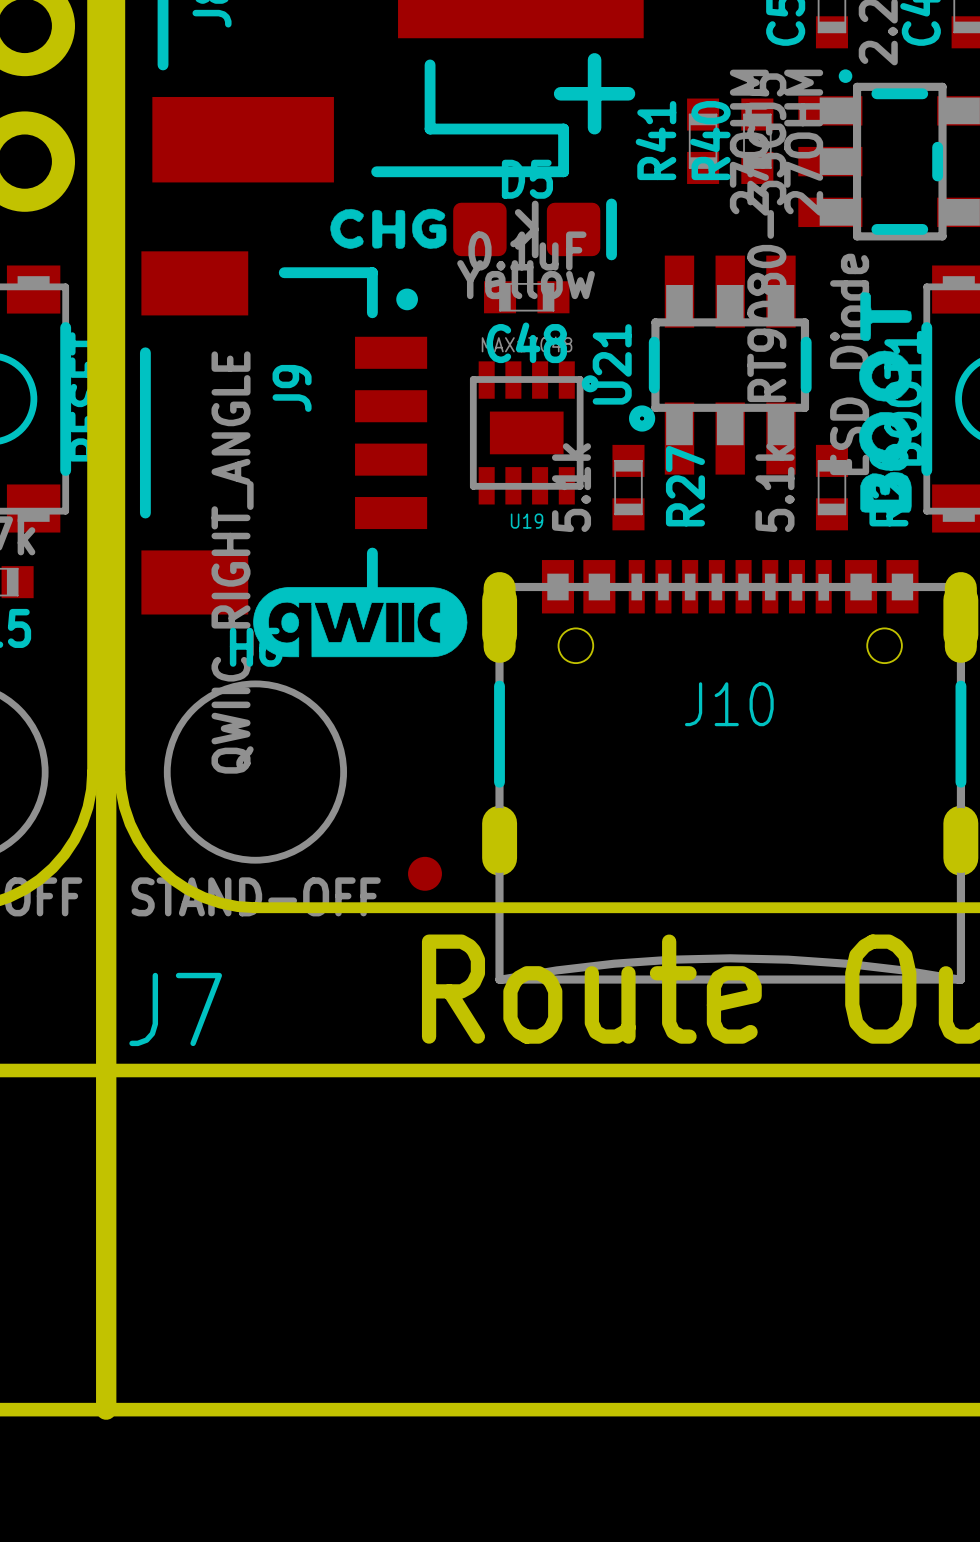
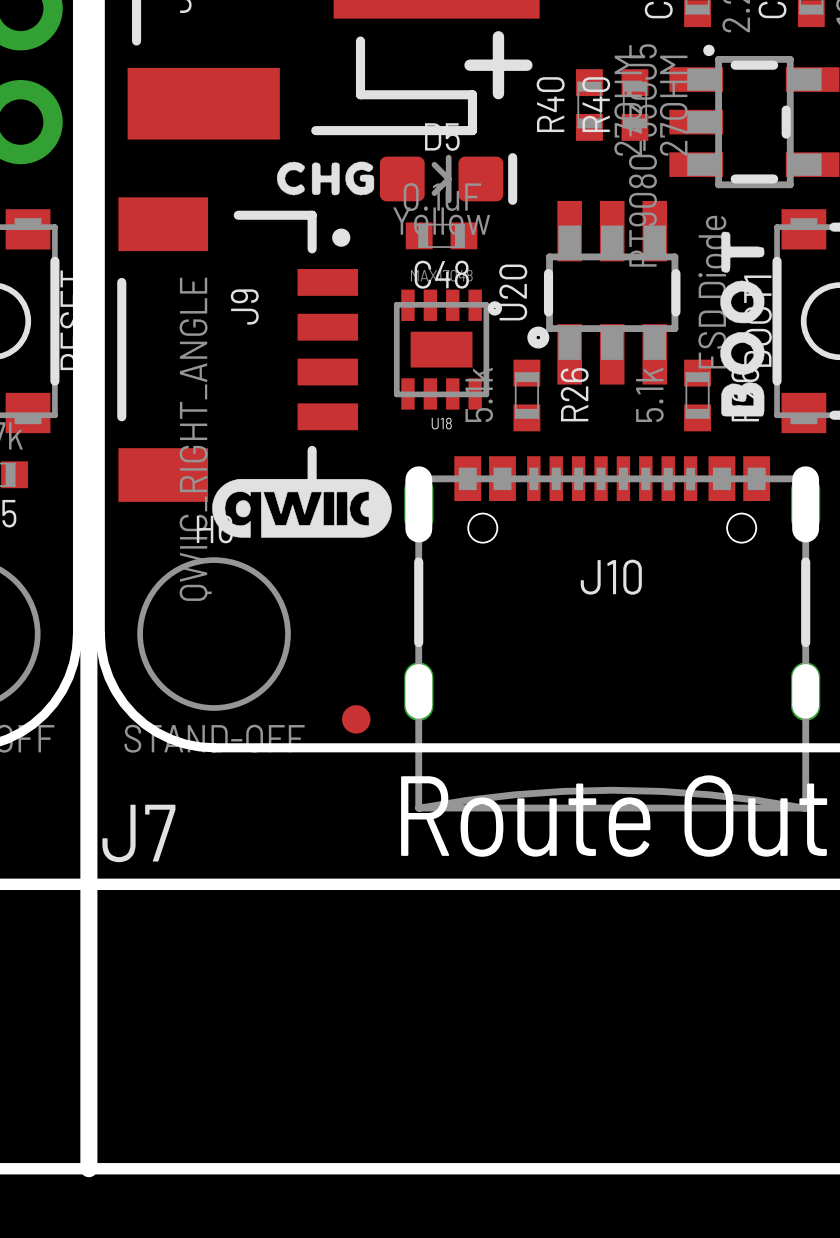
R41 name: R41 (656, 140) -> R40 (550, 104)
U21 name: U21 (612, 364) -> U20 (513, 292)
R27 name: R27 (685, 486) -> R26 (574, 394)
U19 name: U19 (527, 521) -> U18 (441, 423)

